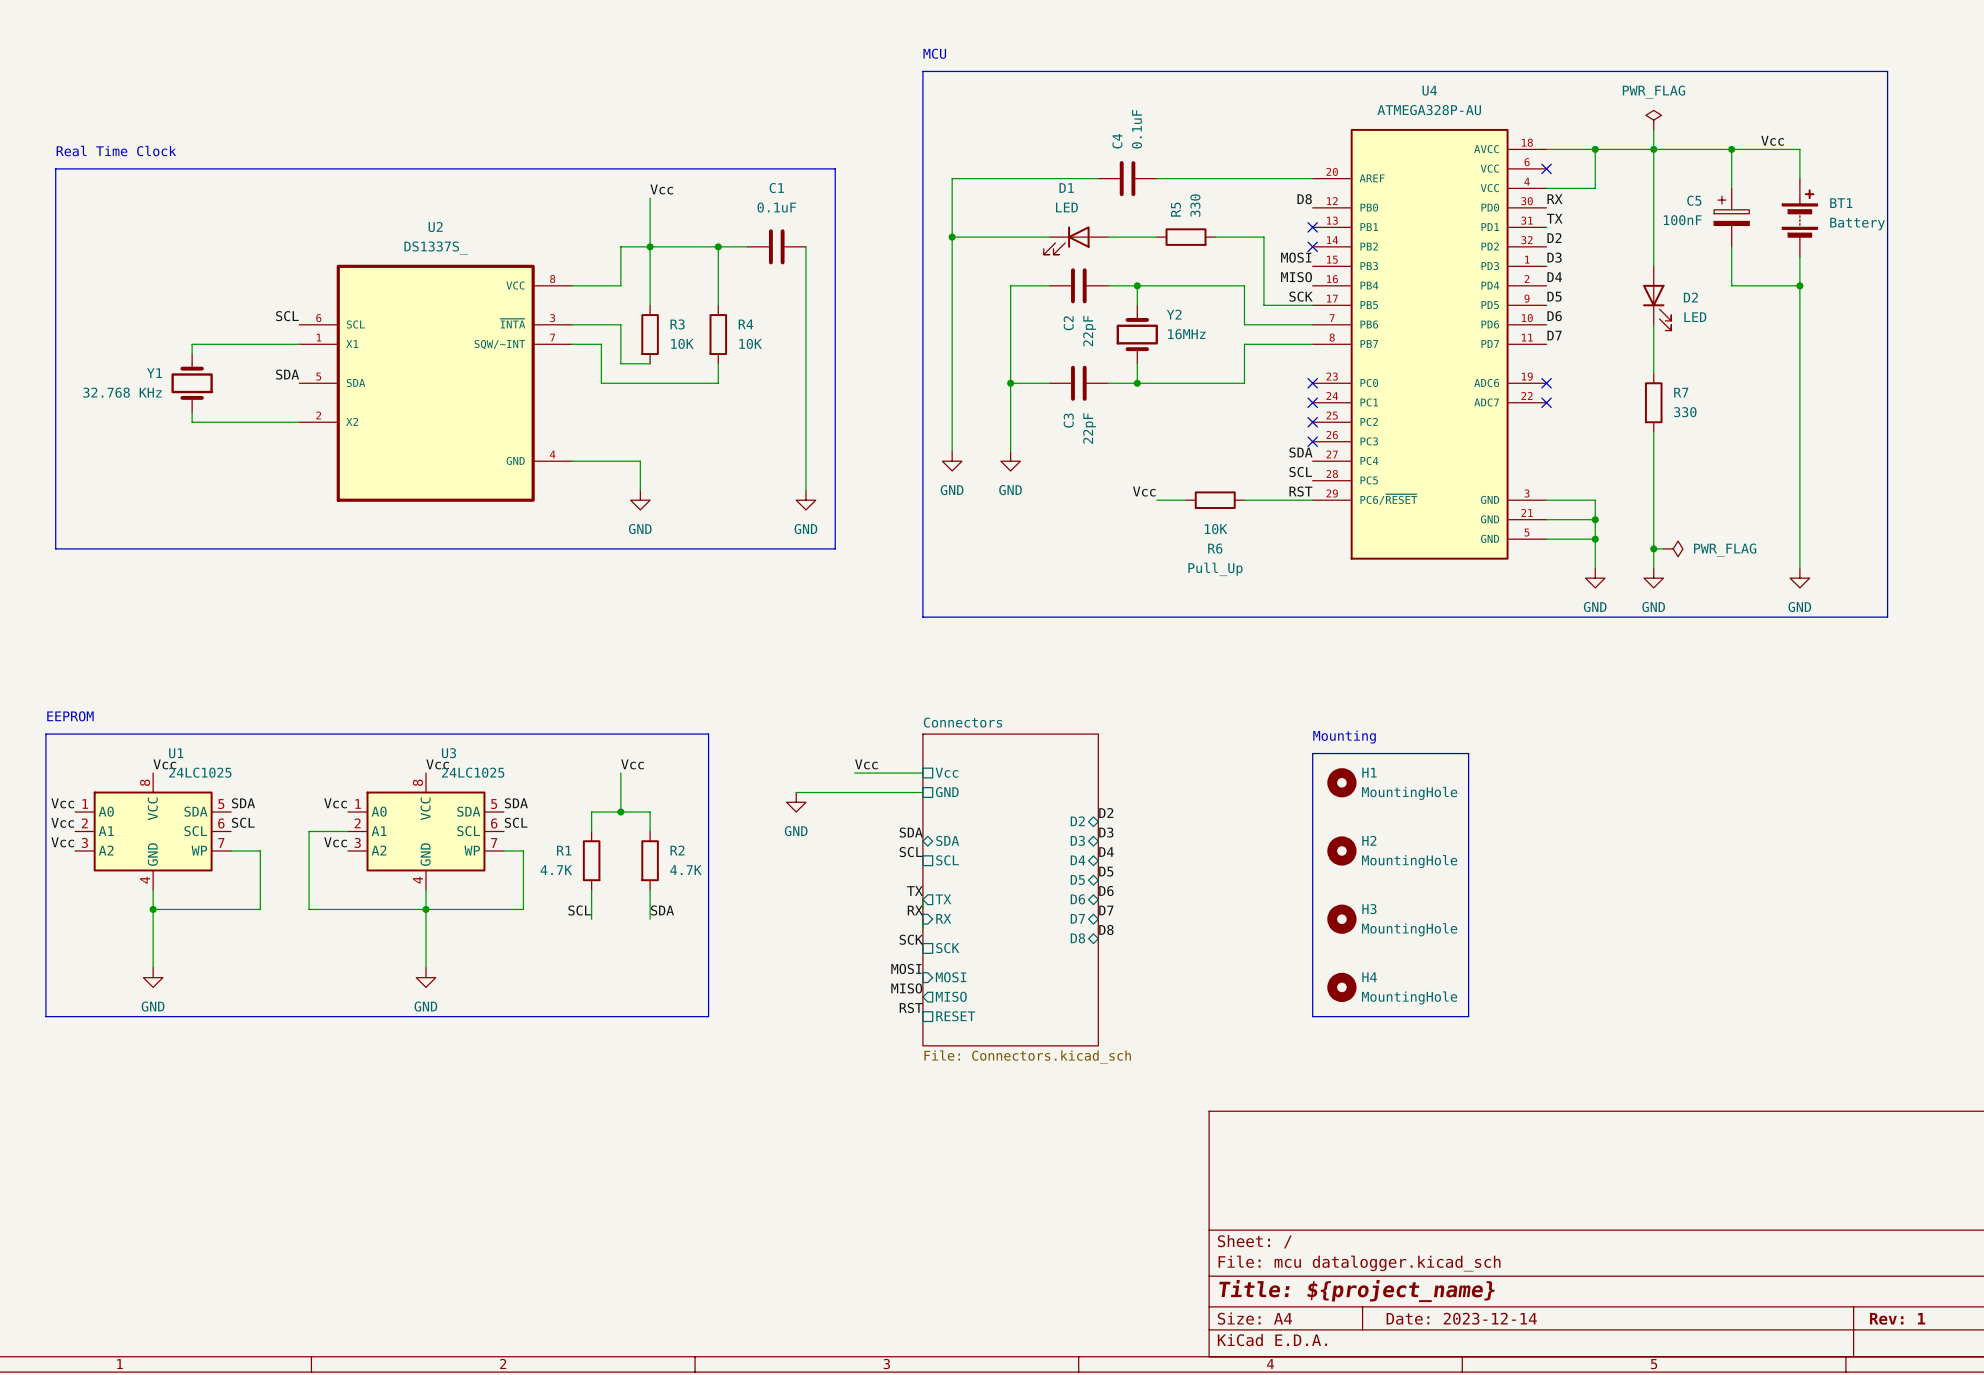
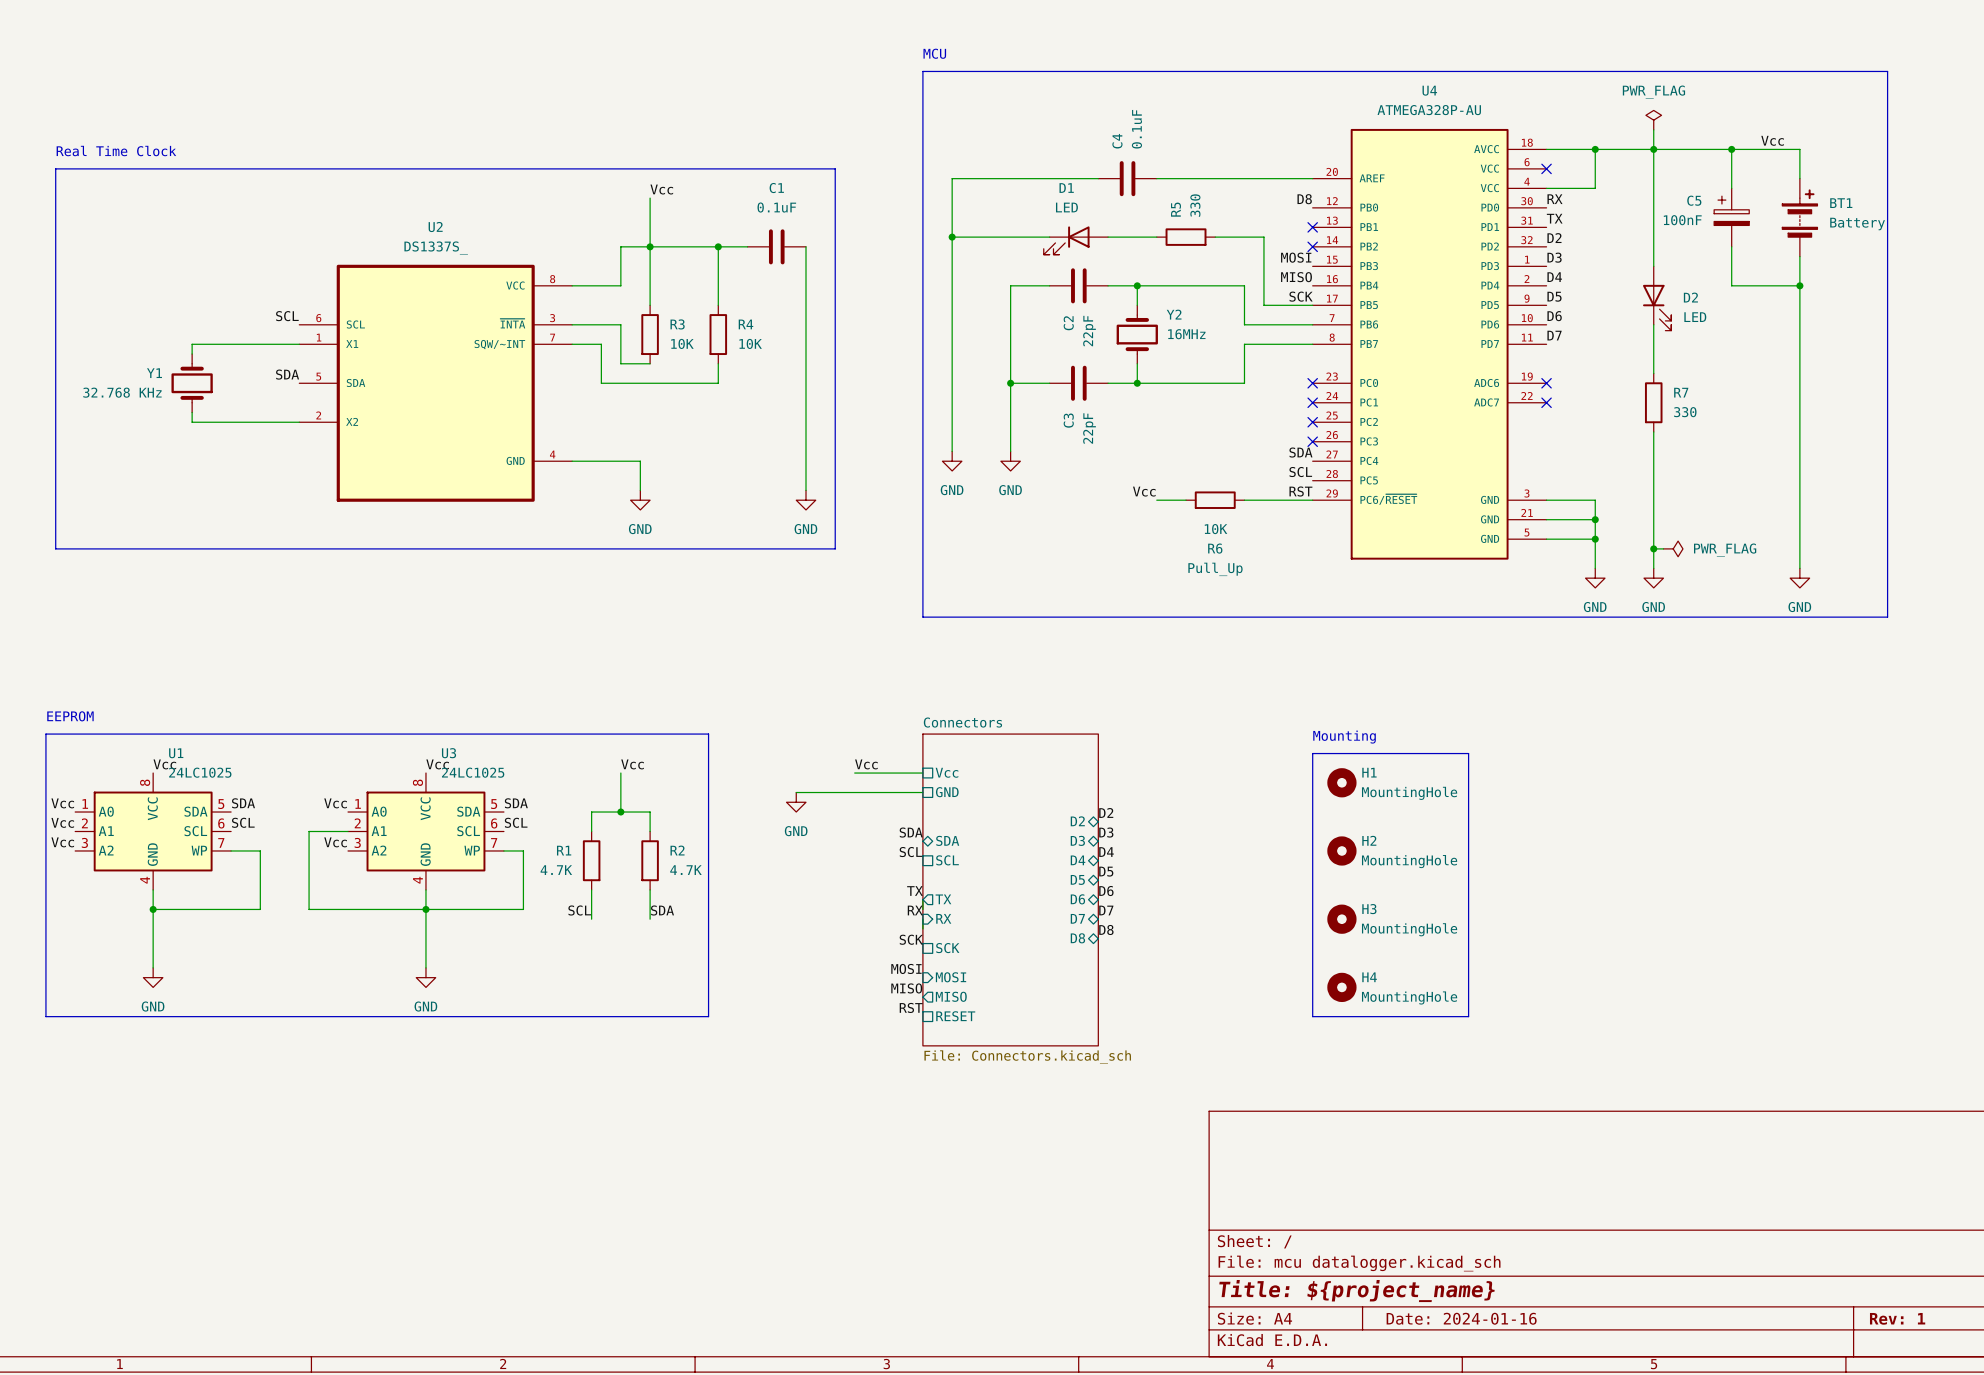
title block: Date: 2023-12-14 (1461, 1318) -> Date: 2024-01-16 (1461, 1318)

